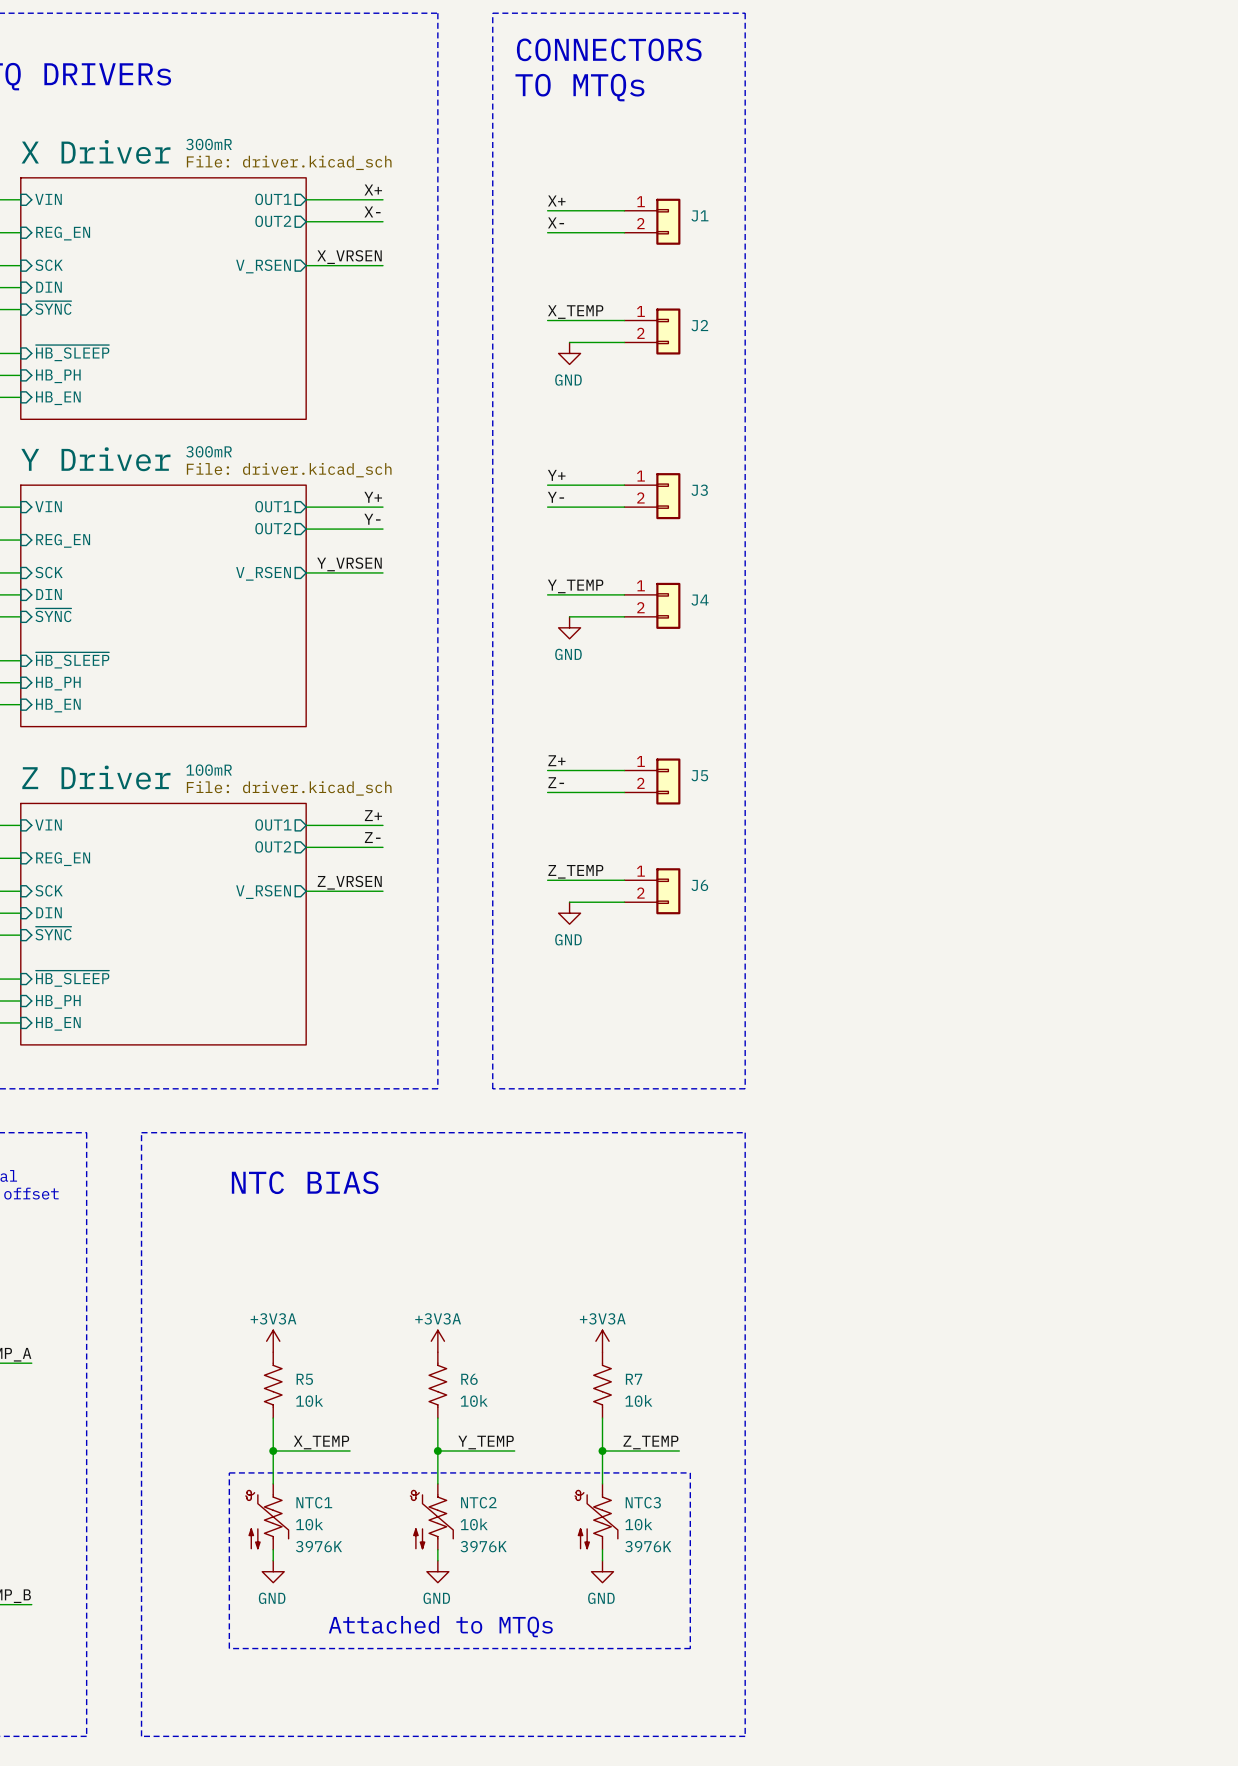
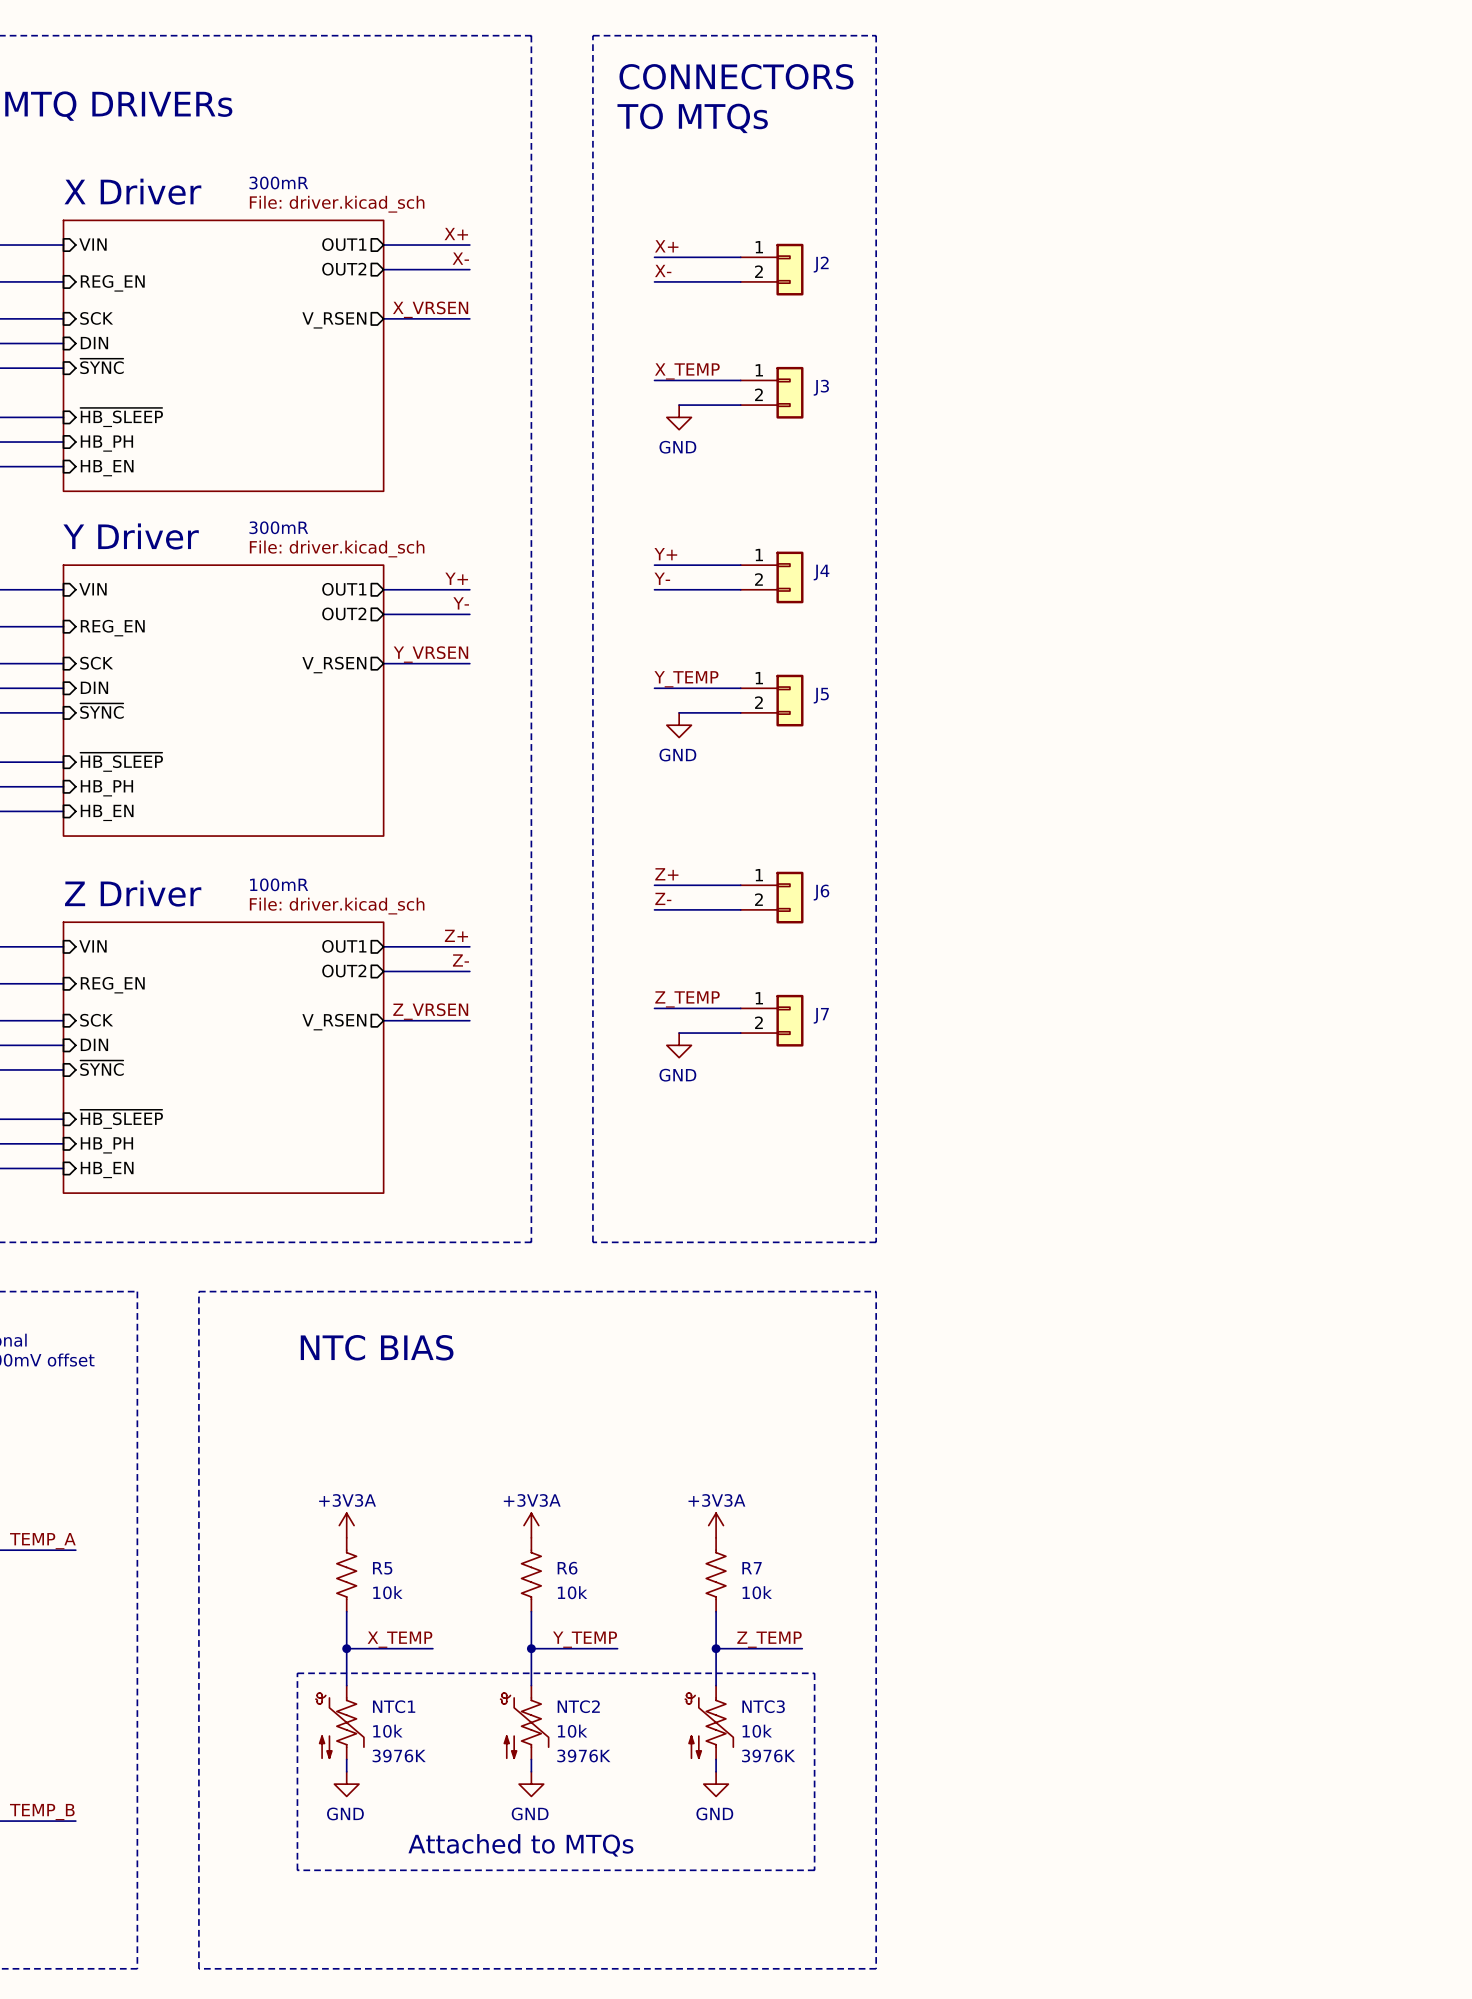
J1 name: J1 (699, 215) -> J2 (821, 264)
J2 name: J2 (699, 325) -> J3 (821, 387)
J3 name: J3 (699, 490) -> J4 (821, 572)
J4 name: J4 (700, 600) -> J5 (821, 695)
J5 name: J5 (699, 775) -> J6 (821, 892)
J6 name: J6 (699, 885) -> J7 (821, 1015)

